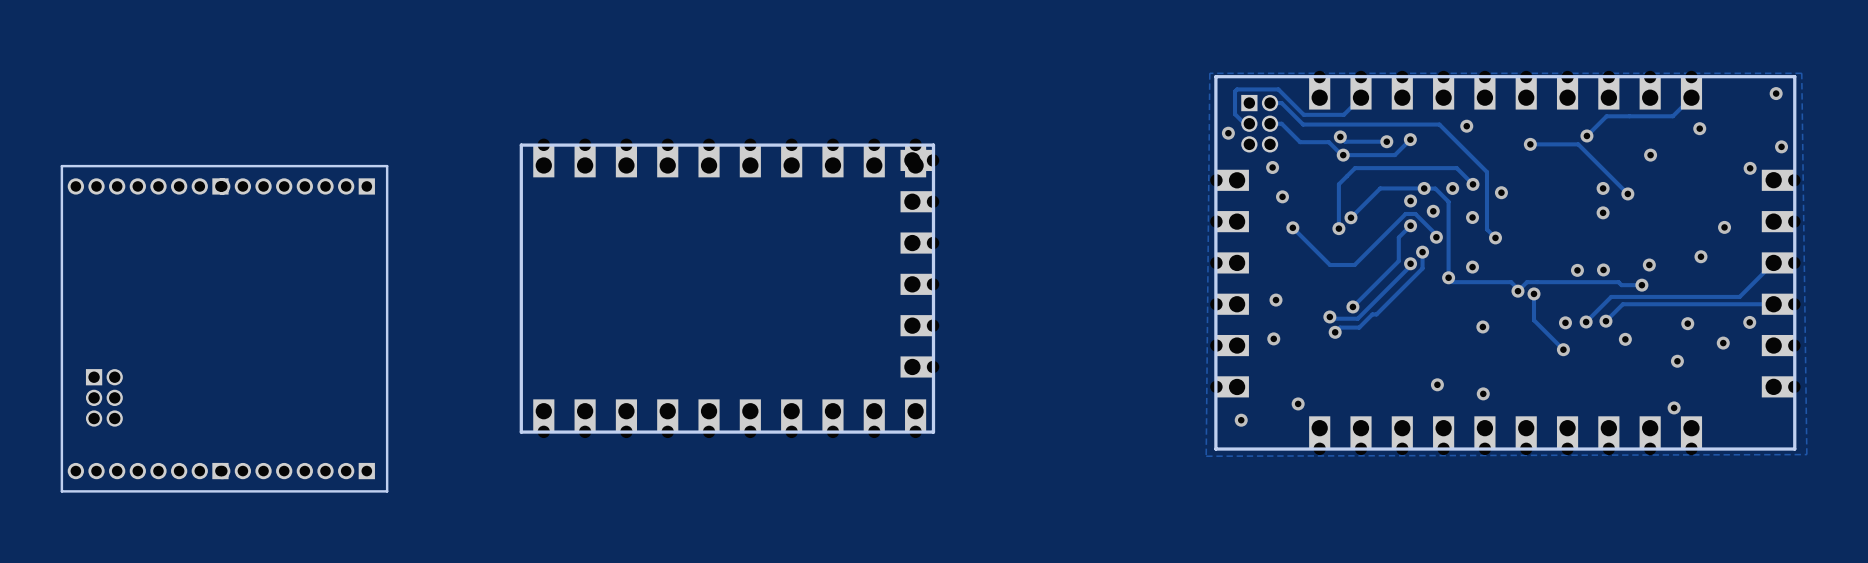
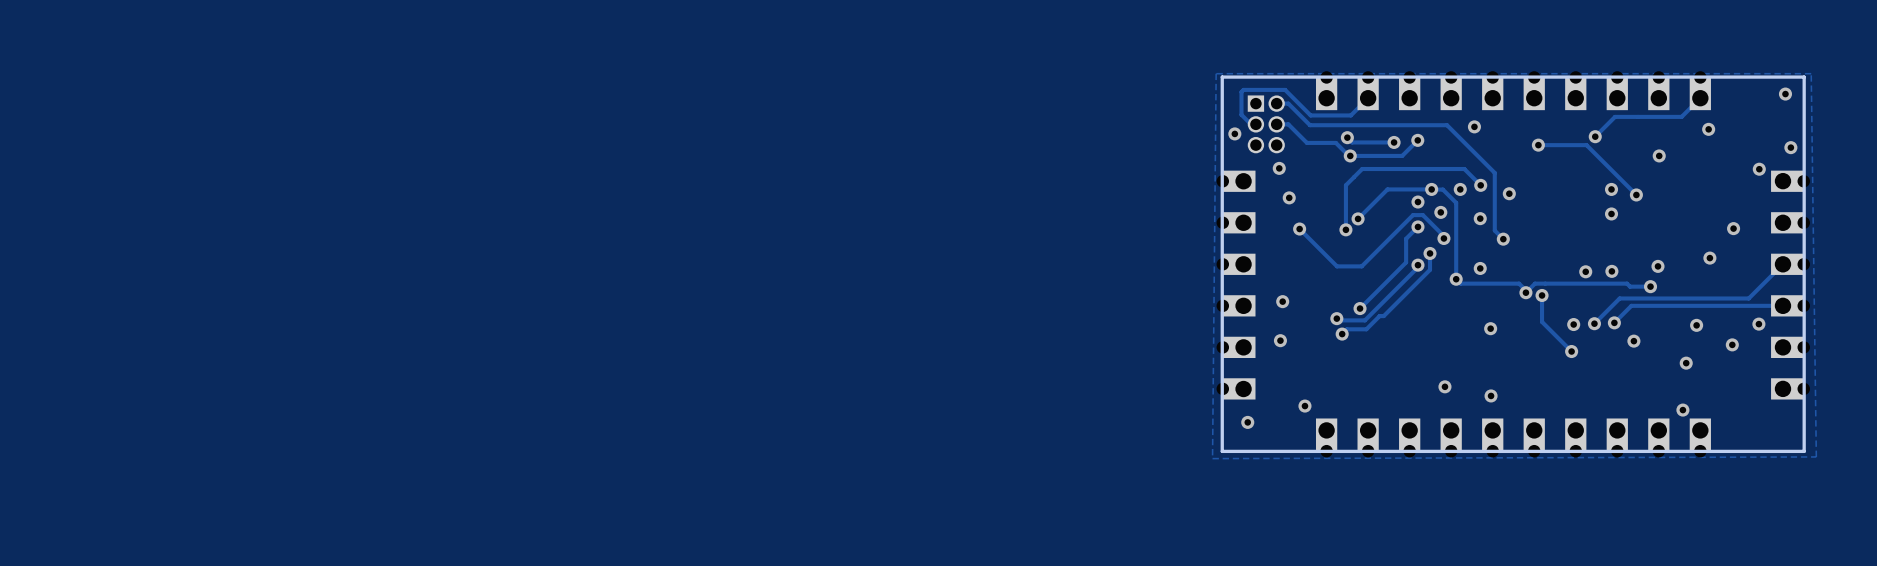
board edge: (933, 145) (933, 432) (521, 432) (521, 145) (933, 145) -> none
part: (729, 157) -> none
board edge: (387, 166) (61, 166) (61, 491) (387, 491) (387, 166) -> none
part: (148, 186) -> none
part: (294, 186) -> none
part: (919, 263) -> none
part: (104, 397) -> none
part: (729, 418) -> none
part: (148, 471) -> none
part: (294, 471) -> none

